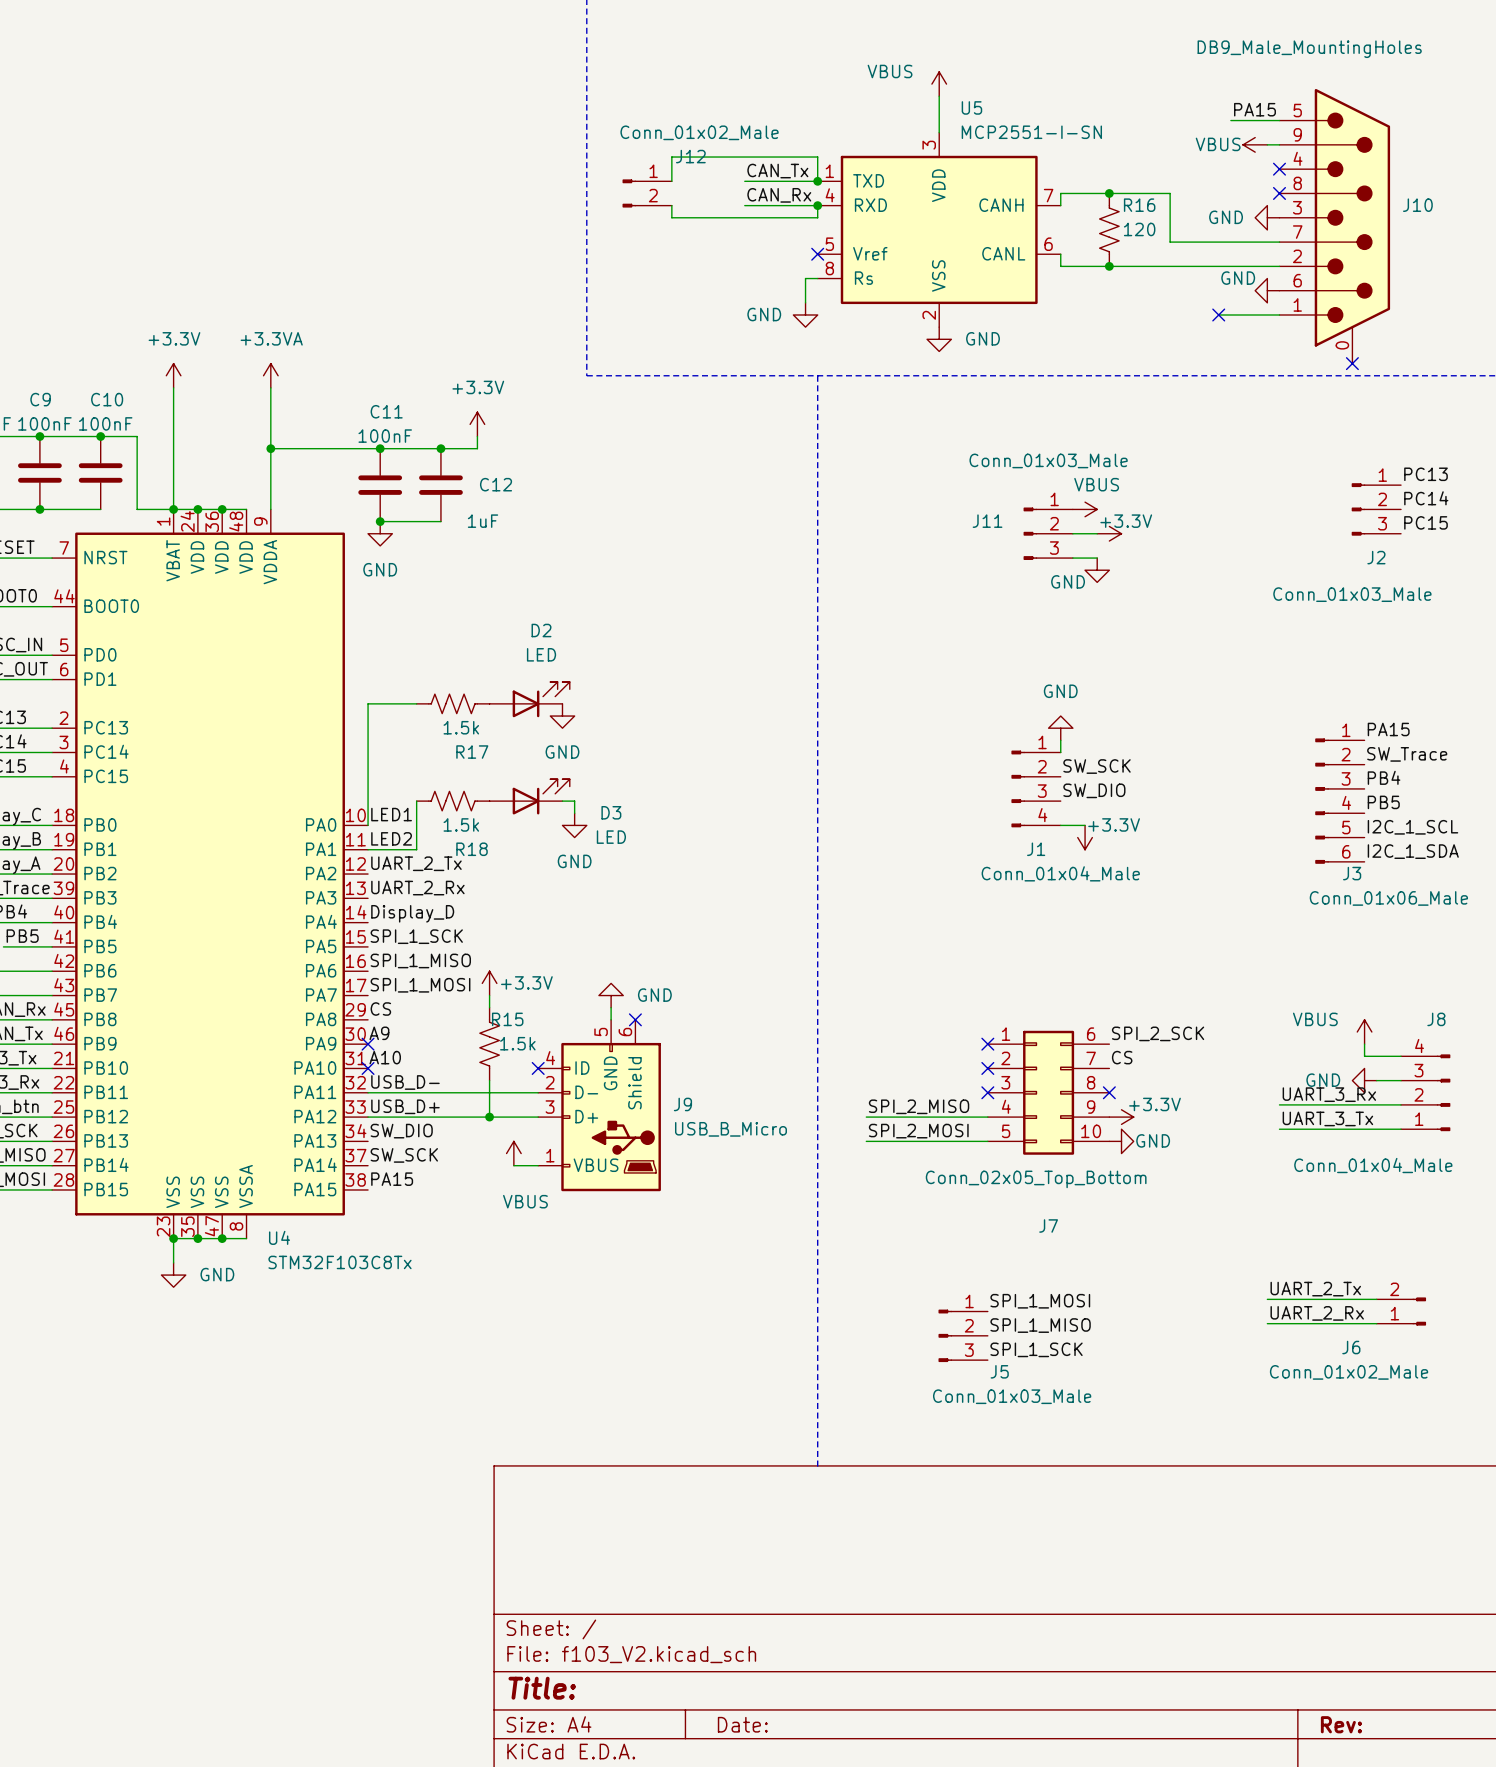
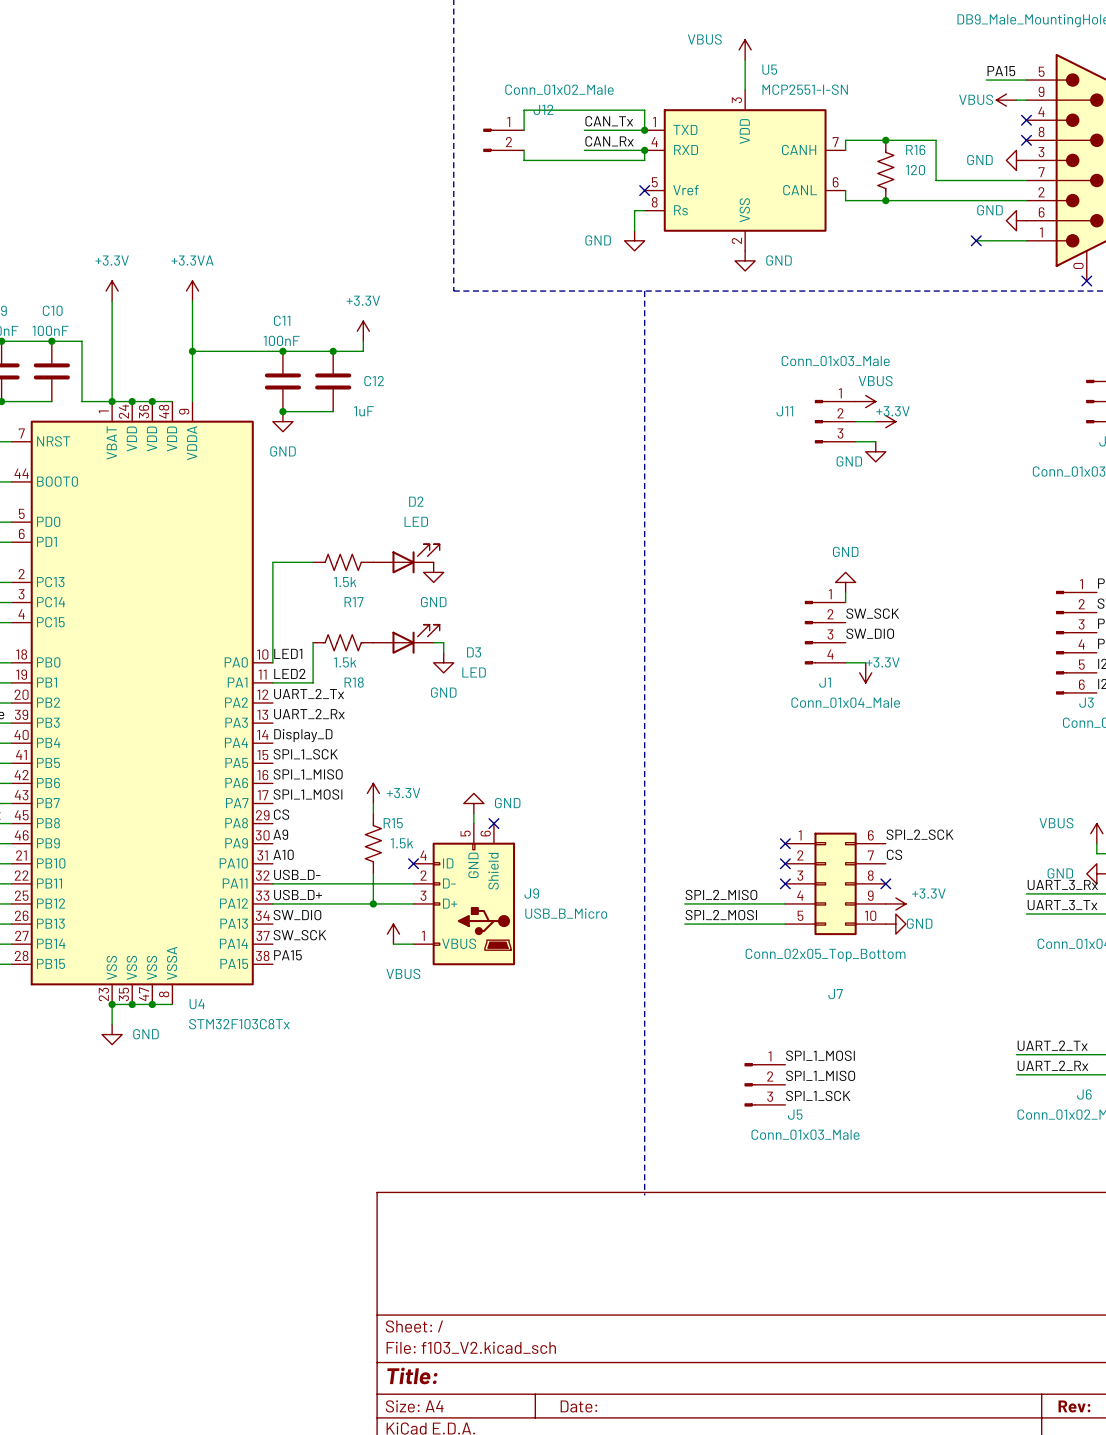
no-connect mark: (368, 1044) -> none
no-connect mark: (368, 1068) -> none

